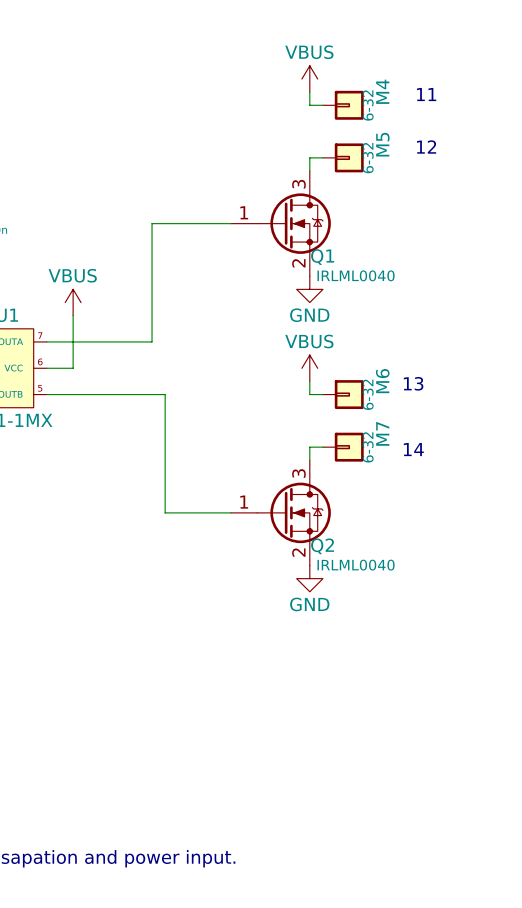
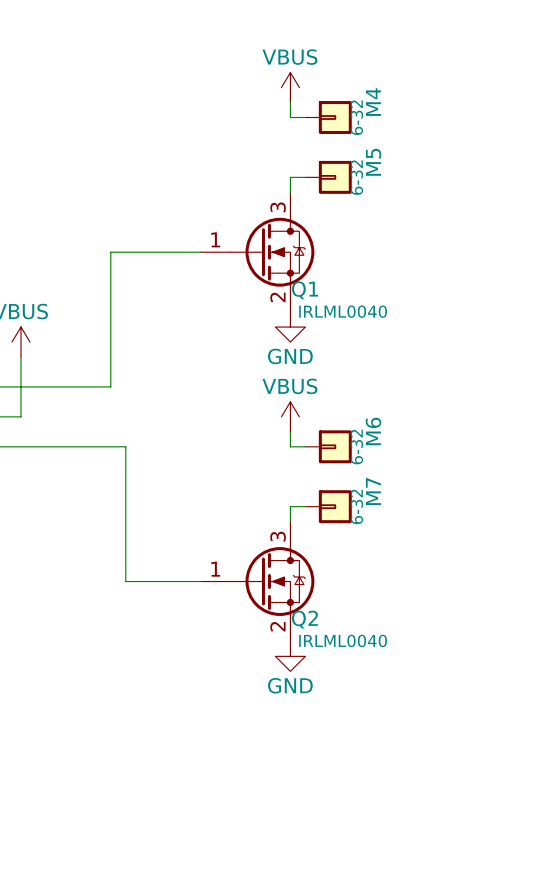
text: 11 (426, 94) -> none
text: 12 (426, 147) -> none
text: 13 (413, 383) -> none
text: 14 (413, 449) -> none

